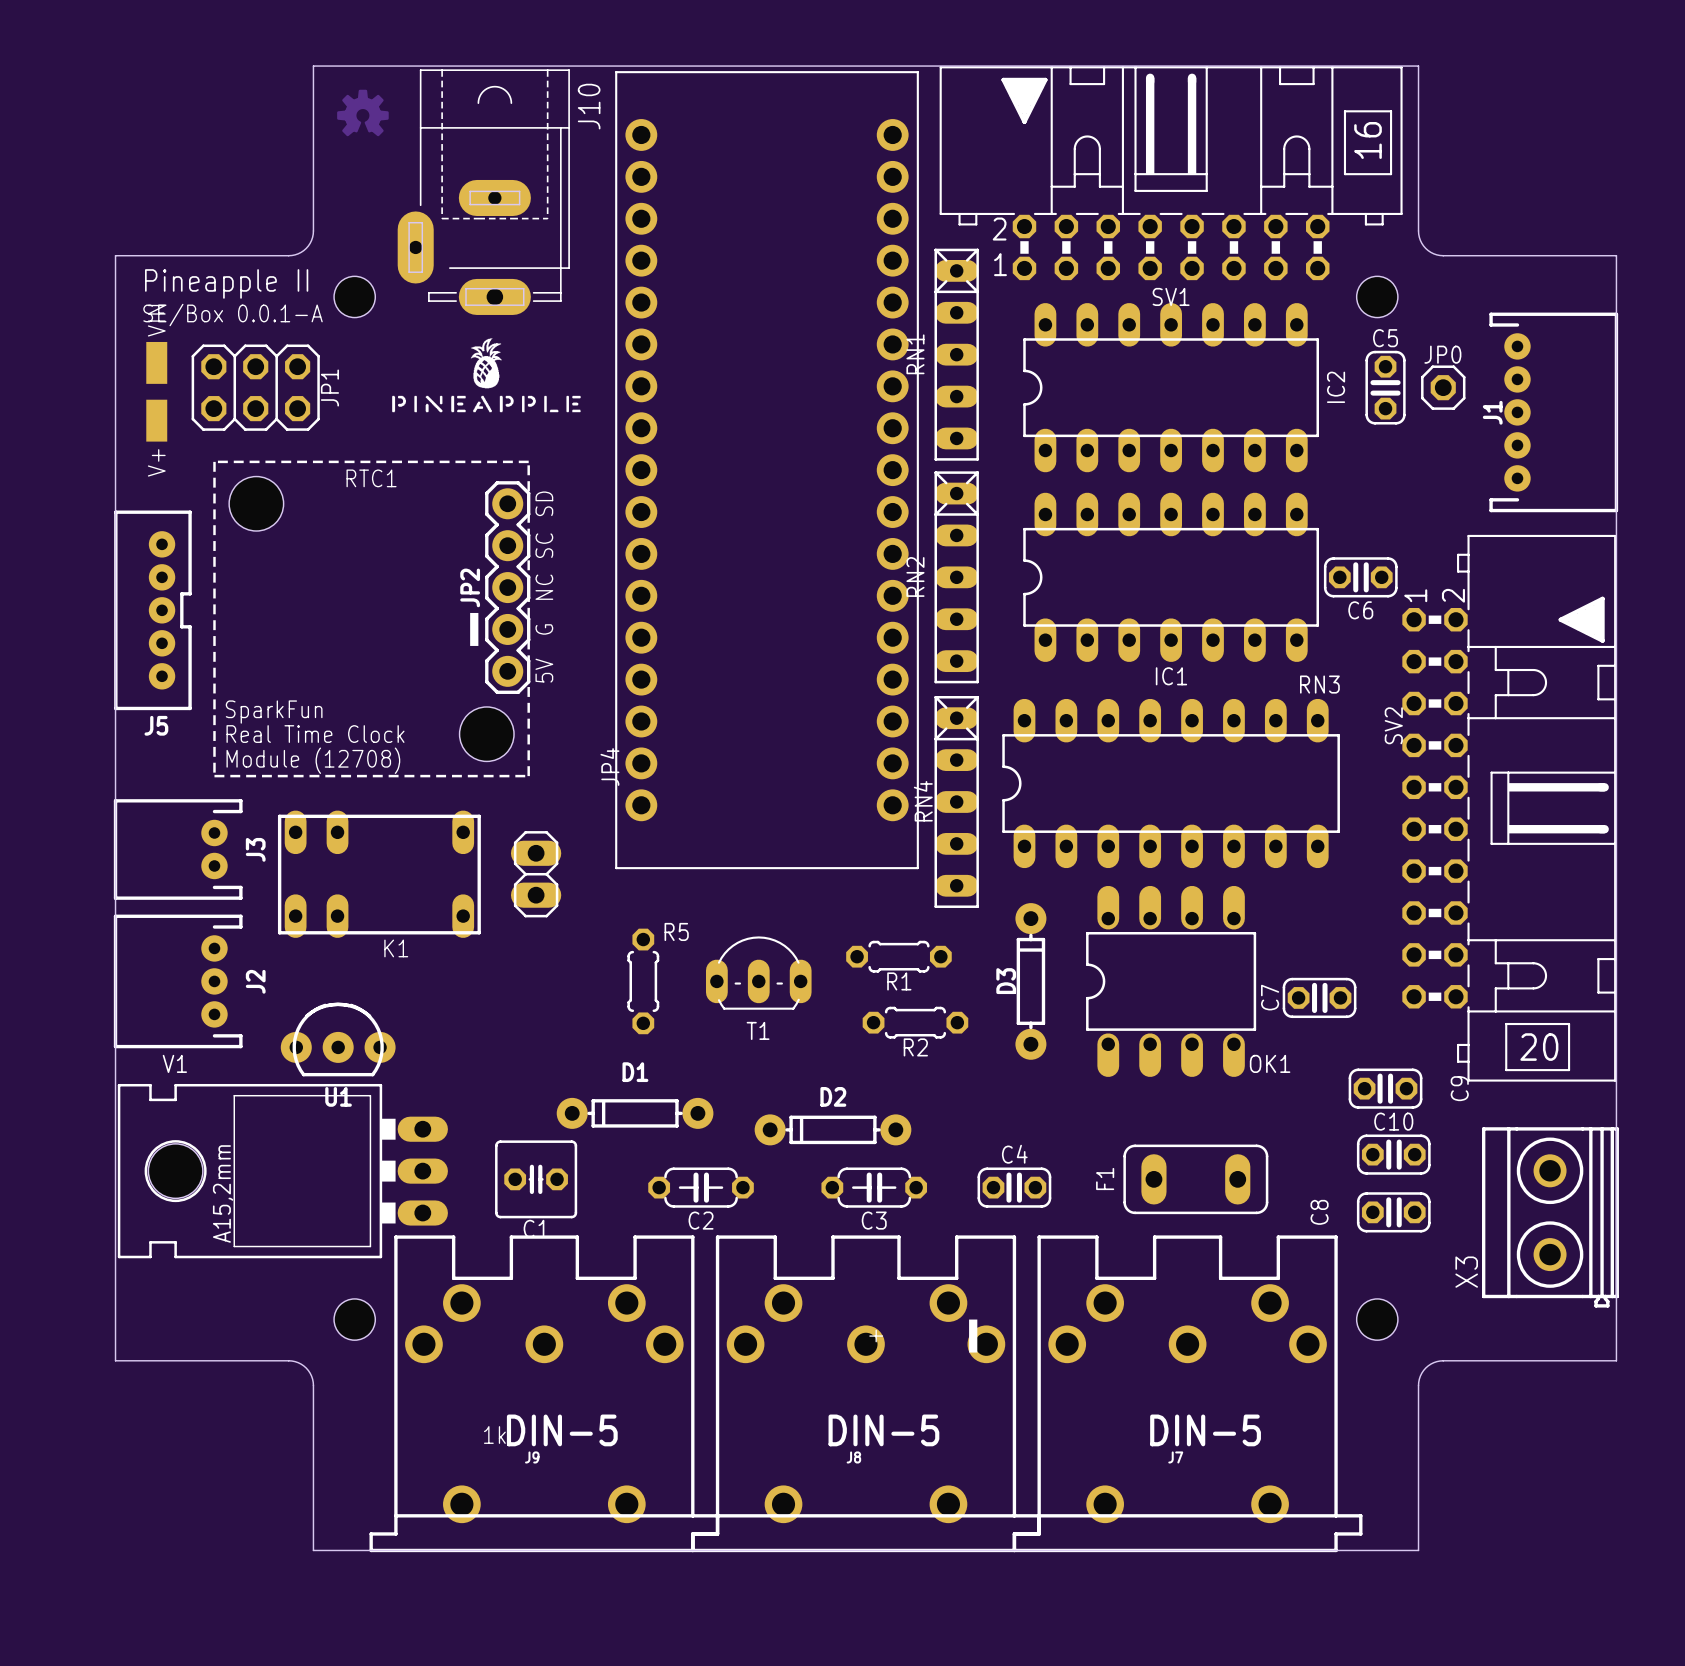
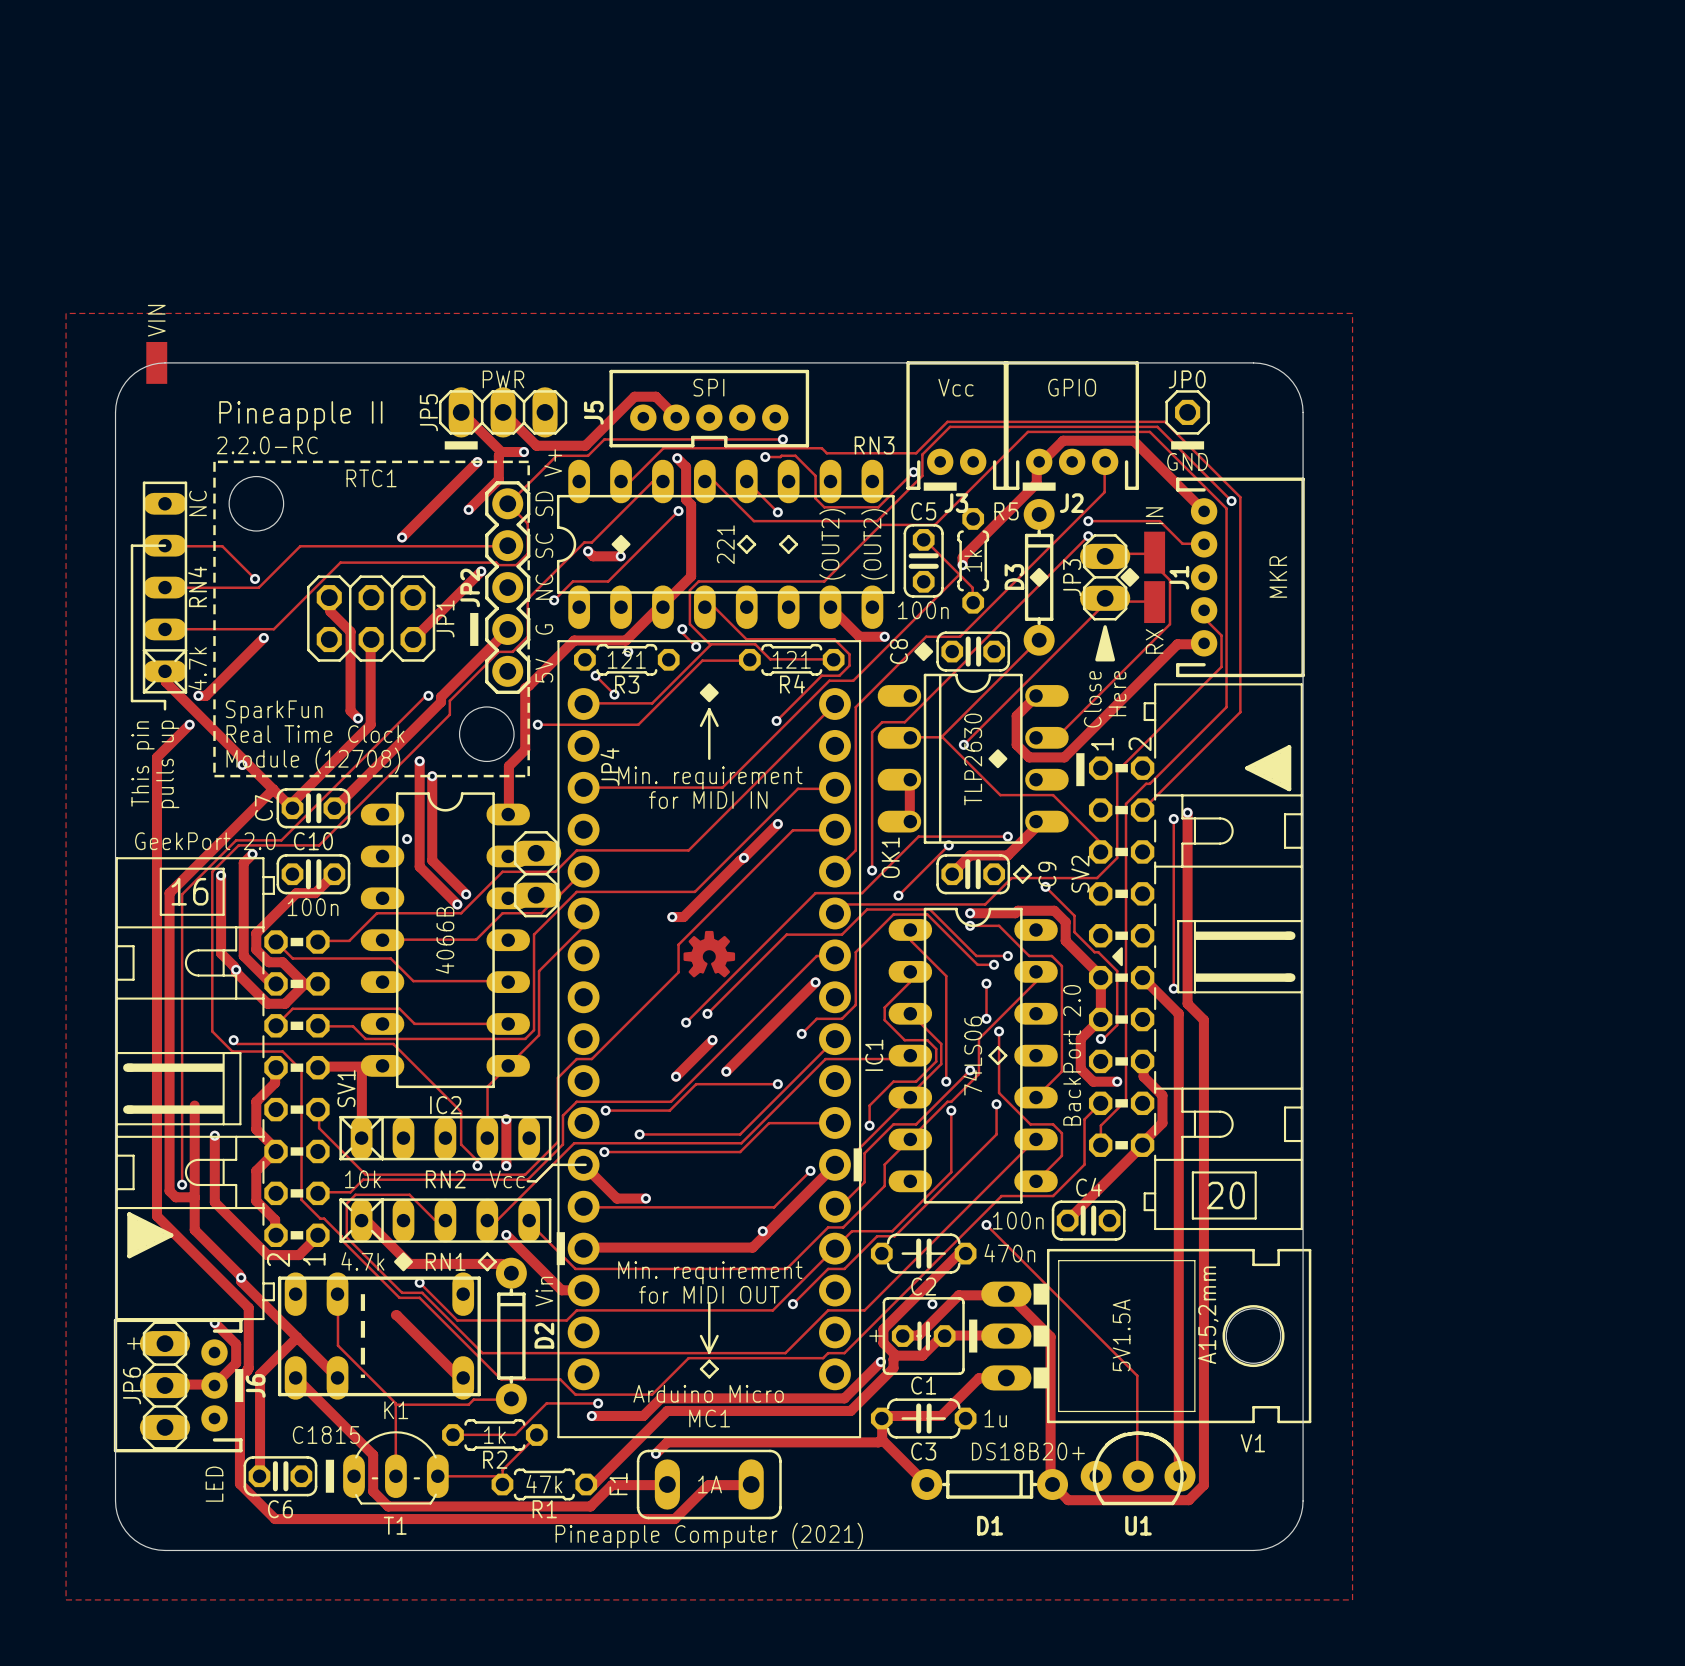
SV1 footprint: [939, 66, 1403, 281] -> [115, 857, 330, 1321]
drawing: [337, 89, 389, 137] -> none
J10: (483, 192) -> none
text position: Pineapple II (226, 283) -> Pineapple II (300, 415)
hole: (354, 296) -> none
SV1 name position: SV1 (1171, 296) -> SV1 (346, 1088)
hole: (1377, 296) -> none
zone outline: none -> (66, 313) (1352, 313) (1352, 1599) (66, 1599) (66, 313)
text: SE/Box 0.0.1-A (233, 315) -> none
drawing: [392, 338, 581, 413] -> none
RN1 rotation: 0° (956, 354) -> 90° counterclockwise (445, 1220)
RN1 position: (956, 354) -> (445, 1220)
text: none -> PWR (503, 379)
JP1 position: (255, 387) -> (371, 618)
text: none -> SPI (708, 387)
text: none -> Vcc (955, 387)
text: none -> GPIO (1072, 387)
IC2 rotation: 0° (1171, 387) -> 90° clockwise (445, 940)
IC2 position: (1171, 387) -> (445, 940)
C5 position: (1385, 387) -> (923, 560)
JP0 position: (1443, 387) -> (1187, 412)
board edge: (115, 412) (115, 255) (288, 255) (301, 252) (310, 243) (313, 230) (313, 66) (1418, 66) (1418, 230) (1420, 240) (1425, 248) (1433, 253) (1443, 255) (1616, 255) (1616, 1360) (1443, 1360) (1430, 1364) (1421, 1373) (1418, 1382) (1418, 1550) (1253, 1550) -> (115, 412) (119, 393) (130, 377) (146, 366) (165, 362) (1253, 362) (1272, 366) (1288, 377) (1299, 393) (1303, 412) (1303, 1500) (1299, 1519) (1288, 1535) (1272, 1546) (1253, 1550)
track: none -> (461, 412) (501, 452)
track: none -> (503, 412) (536, 445) (585, 445) (634, 396) (655, 396) (676, 417)
JP5: none -> (503, 412)
J1 position: (1553, 412) -> (1240, 577)
V+: (156, 420) -> none
track: none -> (782, 439) (604, 439) (588, 455) (556, 455) (507, 503) (527, 523) (527, 553) (516, 565) (498, 565) (496, 562) (340, 562) (273, 629) (165, 629)
via: none -> (782, 439)
drawing: none -> [444, 441, 478, 450]
drawing: none -> [1171, 441, 1205, 450]
text: none -> 2.2.0-RC (267, 445)
track: none -> (501, 452) (523, 452)
track: none -> (501, 452) (498, 455) (498, 479) (468, 509)
via: none -> (523, 452)
track: none -> (765, 457) (795, 455) (815, 475) (815, 498) (824, 507) (878, 507) (913, 472)
via: none -> (765, 457)
track: none -> (677, 458) (686, 467) (686, 499) (691, 504) (691, 576) (664, 602) (662, 607) (658, 607) (625, 640) (574, 640) (525, 688) (525, 749) (508, 766) (508, 814)
via: none -> (677, 458)
track: none -> (1105, 461) (1104, 492) (960, 636) (926, 636) (855, 707) (855, 850) (834, 871)
text: none -> GND (1187, 461)
track: none -> (477, 462) (402, 537)
via: none -> (477, 462)
text: none -> V+ (553, 462)
part: (767, 470) -> none
via: none -> (913, 472)
track: none -> (621, 481) (630, 480) (663, 448) (821, 448) (826, 453) (916, 453) (947, 421) (1164, 421) (1240, 497) (1240, 712) (1142, 810)
track: none -> (662, 481) (652, 482) (591, 542) (584, 542) (527, 599) (527, 636) (512, 651) (498, 651) (449, 700) (449, 714) (319, 845) (238, 845) (212, 871) (212, 1031) (232, 1051) (282, 1051) (301, 1070) (301, 1199) (320, 1218) (324, 1218) (341, 1236) (341, 1240) (399, 1297) (419, 1297) (501, 1379) (560, 1379) (575, 1394) (652, 1394) (688, 1358) (823, 1358) (828, 1353) (844, 1353) (1001, 1196) (1053, 1196) (1084, 1164) (1084, 1119) (1100, 1103)
track: none -> (704, 481) (715, 482) (753, 521) (877, 521) (922, 475) (922, 454) (950, 426) (1157, 426) (1231, 501)
track: none -> (746, 481) (777, 512)
drawing: none -> [923, 482, 957, 491]
drawing: none -> [1022, 482, 1056, 491]
via: none -> (1231, 501)
text: none -> NC (197, 503)
via: none -> (468, 509)
track: none -> (678, 511) (608, 581) (573, 581) (554, 600)
via: none -> (678, 511)
track: none -> (1204, 511) (1133, 440) (1063, 440) (1043, 460) (1039, 460) (1036, 465) (1036, 483) (962, 557) (962, 565)
via: none -> (777, 512)
track: none -> (1088, 521) (1159, 521) (1182, 543) (1204, 544)
via: none -> (1088, 521)
drawing: none -> [611, 534, 631, 554]
line: none -> (746, 536) (738, 544) (746, 552) (754, 544) (746, 536)
line: none -> (788, 536) (780, 544) (788, 552) (796, 544) (788, 536)
track: none -> (1088, 536) (904, 722) (882, 722) (872, 732) (872, 870)
via: none -> (1088, 536)
via: none -> (402, 537)
track: none -> (923, 539) (972, 587) (973, 602)
text: none -> 221 (725, 544)
text: none -> (OUT2) (832, 544)
text: none -> (OUT2) (874, 544)
line: none -> (165, 545) (132, 545) (132, 701) (165, 701) (165, 709)
track: none -> (165, 545) (222, 546) (255, 578)
track: none -> (507, 545) (300, 546) (258, 587) (165, 587)
track: none -> (588, 551) (593, 556) (620, 556)
via: none -> (588, 551)
IN: none -> (1154, 552)
via: none -> (620, 556)
track: none -> (1105, 556) (1108, 553) (1154, 552) (1153, 563) (1169, 580) (1169, 624) (1056, 737) (1036, 737)
text: none -> 1k (973, 560)
via: none -> (962, 565)
drawing: none -> [1029, 567, 1049, 587]
drawing: none -> [1120, 567, 1140, 587]
track: none -> (481, 571) (413, 639)
via: none -> (481, 571)
track: none -> (959, 574) (853, 680) (829, 680) (722, 787) (583, 787)
text: none -> MKR (1278, 576)
RN2 rotation: 0° (956, 577) -> 90° counterclockwise (445, 1138)
RN2 position: (956, 577) -> (445, 1138)
JP3: none -> (1105, 577)
IC1 rotation: 0° (1171, 577) -> 90° clockwise (973, 1055)
IC1 position: (1171, 577) -> (973, 1055)
C6 position: (1360, 577) -> (280, 1476)
via: none -> (255, 578)
track: none -> (329, 597) (330, 611) (350, 631) (350, 710) (358, 718)
via: none -> (554, 600)
track: none -> (1154, 602) (1108, 601) (1105, 598) (1107, 601) (963, 744)
RX: none -> (1154, 602)
track: none -> (704, 607) (715, 607) (746, 639) (834, 639) (849, 654) (849, 665) (839, 675) (821, 675) (776, 720)
track: none -> (830, 607) (859, 636) (884, 636)
J5 rotation: 0° (152, 610) -> 90° clockwise (709, 408)
J5 position: (152, 610) -> (709, 408)
text: none -> 100n (923, 610)
track: none -> (1204, 610) (1205, 619) (1221, 635) (1221, 666) (1117, 771) (1117, 857) (1097, 878) (1011, 878) (985, 904) (844, 904) (834, 913)
drawing: none -> [1095, 625, 1116, 662]
track: none -> (507, 629) (441, 697) (441, 702) (334, 808)
track: none -> (682, 629) (682, 632) (696, 646)
via: none -> (682, 629)
via: none -> (884, 636)
track: none -> (263, 638) (206, 695) (198, 695)
via: none -> (263, 638)
track: none -> (371, 639) (370, 724) (292, 802) (292, 808) (165, 682) (165, 671)
track: none -> (1039, 640) (941, 737) (910, 737)
drawing: none -> [914, 642, 934, 662]
track: none -> (1204, 643) (1177, 644) (1064, 757) (1029, 757) (1016, 744) (1016, 715) (1036, 695)
track: none -> (710, 644) (689, 624) (689, 590) (698, 581) (824, 581) (880, 524) (934, 524) (1027, 431) (1149, 431) (1226, 508) (1226, 707) (1149, 783) (1146, 783) (1126, 803) (1126, 1100) (1100, 1125) (1100, 1145)
via: none -> (696, 646)
via: none -> (628, 651)
text: none -> 121 (626, 659)
R3: none -> (626, 659)
track: none -> (749, 659) (702, 660) (638, 724) (537, 724)
text: none -> 121 (791, 659)
R4: none -> (791, 659)
track: none -> (833, 659) (770, 659) (755, 644) (711, 644) (652, 703) (583, 704)
text: none -> 4.7k (197, 668)
track: none -> (595, 675) (614, 694)
via: none -> (595, 675)
line: none -> (940, 676) (940, 841)
drawing: none -> [699, 683, 719, 703]
text: none -> Here (1117, 693)
via: none -> (614, 694)
via: none -> (198, 695)
track: none -> (428, 695) (425, 695) (281, 840) (236, 840) (182, 894) (182, 1184)
via: none -> (428, 695)
text: none -> Close (1092, 699)
track: none -> (834, 704) (688, 850) (576, 850) (555, 871) (502, 871) (461, 913) (376, 913) (349, 940) (317, 942)
line: none -> (709, 709) (709, 758)
line: none -> (709, 709) (701, 725)
line: none -> (709, 709) (717, 725)
via: none -> (358, 718)
via: none -> (776, 720)
track: none -> (189, 724) (156, 757) (156, 1216) (248, 1307) (248, 1368) (239, 1378) (239, 1483) (275, 1519) (674, 1519) (708, 1485) (751, 1484)
via: none -> (189, 724)
via: none -> (537, 724)
track: none -> (941, 736) (1000, 795) (1053, 795) (1099, 841) (1100, 851)
via: none -> (963, 744)
drawing: none -> [988, 749, 1008, 769]
drawing: none -> [1076, 753, 1085, 787]
text: none -> TLP2630 (973, 759)
track: none -> (419, 761) (419, 866) (457, 904)
via: none -> (419, 761)
text: none -> This pin (143, 764)
text: none -> pulls up (167, 764)
via: none -> (242, 764)
track: none -> (432, 776) (432, 860) (466, 894)
via: none -> (432, 776)
text: none -> Min. requirement (710, 778)
track: none -> (910, 779) (910, 821)
RN3 position: (1171, 783) -> (725, 544)
track: none -> (834, 787) (797, 788) (694, 891) (576, 891) (534, 934) (534, 1030) (525, 1038) (365, 1038) (353, 1026) (317, 1025)
track: none -> (273, 789) (169, 893) (169, 1191) (175, 1197) (194, 1197)
text: none -> for MIDI IN (708, 800)
RN4 rotation: 0° (956, 801) -> 180° (165, 587)
RN4 position: (956, 801) -> (165, 587)
SV2 position: (1509, 808) -> (1195, 956)
track: none -> (1187, 812) (1187, 1003) (1203, 1020) (1203, 1485) (1188, 1500) (1068, 1500) (1050, 1480) (1050, 1336) (1006, 1294) (958, 1295) (918, 1335) (902, 1336)
via: none -> (1187, 812)
track: none -> (1173, 819) (1173, 988)
via: none -> (1173, 819)
track: none -> (1036, 821) (1035, 827) (1007, 855) (970, 855) (952, 874)
track: none -> (777, 824) (683, 917) (672, 917)
via: none -> (777, 824)
track: none -> (834, 829) (792, 830) (678, 944) (678, 972) (591, 1059) (576, 1059) (557, 1077) (557, 1142) (525, 1174) (365, 1174) (319, 1128) (317, 1109)
track: none -> (1007, 836) (918, 836) (862, 893) (815, 893) (686, 1022)
via: none -> (1007, 836)
via: none -> (407, 839)
text: none -> GeekPort 2.0 (205, 841)
track: none -> (948, 845) (898, 895)
via: none -> (948, 845)
J3 rotation: 0° (178, 849) -> 90° clockwise (956, 425)
J3 position: (178, 849) -> (956, 425)
track: none -> (252, 854) (243, 862) (243, 955) (271, 983) (276, 983)
via: none -> (252, 854)
via: none -> (743, 857)
line: none -> (1022, 865) (1014, 874) (1022, 882) (1030, 874) (1022, 865)
via: none -> (872, 870)
track: none -> (583, 871) (541, 913) (502, 913) (476, 939) (382, 940)
track: none -> (334, 874) (315, 893) (296, 893) (256, 933) (256, 949) (268, 962) (282, 962) (304, 984)
K1 position: (379, 874) -> (379, 1336)
track: none -> (221, 875) (221, 953) (233, 966) (236, 972) (267, 1003) (285, 1003) (304, 984)
via: none -> (221, 875)
track: none -> (1045, 886) (1074, 915) (1074, 932) (1117, 971) (1117, 1025) (1103, 1038) (1100, 1038)
via: none -> (1045, 886)
via: none -> (466, 894)
via: none -> (898, 895)
via: none -> (457, 904)
text: none -> 100n (313, 907)
track: none -> (583, 913) (583, 927) (539, 971) (539, 1035) (487, 1086) (487, 1138)
track: none -> (970, 913) (1054, 910) (1065, 922) (1065, 940) (1098, 973) (1100, 978) (1100, 1018) (1080, 1038) (1080, 1069) (1093, 1081) (1117, 1081)
via: none -> (970, 913)
via: none -> (672, 917)
track: none -> (970, 925) (999, 925) (1029, 955) (1051, 955) (1061, 966) (1061, 1071) (1036, 1097)
via: none -> (970, 925)
track: none -> (910, 929) (911, 940) (946, 976) (946, 1081)
drawing: none -> [683, 930, 736, 978]
text: none -> 4066B (445, 940)
track: none -> (276, 942) (292, 958) (390, 958) (413, 981) (508, 982)
drawing: none -> [1112, 947, 1123, 967]
track: none -> (834, 955) (816, 955) (671, 1101) (576, 1101) (562, 1115) (562, 1144) (527, 1179) (363, 1179) (350, 1192) (317, 1193)
track: none -> (1007, 955) (976, 955) (929, 909) (867, 909) (841, 934) (786, 934) (707, 1013)
via: none -> (1007, 955)
R1 position: (898, 956) -> (544, 1484)
track: none -> (994, 964) (977, 964) (927, 914) (893, 914) (855, 952) (855, 1005) (841, 1018) (816, 1018) (801, 1033)
via: none -> (994, 964)
via: none -> (236, 969)
track: none -> (910, 971) (909, 982) (884, 1007) (884, 1020) (904, 1040) (927, 1040) (936, 1049) (936, 1061) (916, 1081) (893, 1081) (869, 1105) (869, 1125)
track: none -> (1036, 971) (1035, 982) (978, 1038) (978, 1074) (951, 1101) (947, 1101) (884, 1164) (884, 1185) (843, 1227) (828, 1227) (786, 1268) (575, 1268) (529, 1220)
T1 position: (758, 973) -> (395, 1467)
track: none -> (1142, 977) (1178, 1013) (1180, 1476)
J2 rotation: 0° (178, 981) -> 90° clockwise (1072, 425)
J2 position: (178, 981) -> (1072, 425)
R5 position: (643, 981) -> (973, 560)
D3 position: (1030, 981) -> (1039, 577)
OK1 rotation: 0° (1171, 981) -> 90° clockwise (973, 758)
OK1 position: (1171, 981) -> (973, 758)
track: none -> (815, 982) (726, 1071)
via: none -> (815, 982)
track: none -> (986, 983) (986, 1018)
via: none -> (986, 983)
via: none -> (1173, 988)
C7 position: (1319, 997) -> (313, 808)
via: none -> (707, 1013)
track: none -> (910, 1013) (941, 1043) (941, 1064) (855, 1152) (855, 1178)
via: none -> (986, 1018)
via: none -> (686, 1022)
R2 position: (915, 1022) -> (494, 1435)
track: none -> (508, 1023) (414, 1023) (399, 1008) (292, 1008) (276, 1025)
track: none -> (999, 1031) (999, 1092) (1030, 1124) (1053, 1124) (1061, 1133) (1061, 1155) (1036, 1181)
via: none -> (999, 1031)
via: none -> (801, 1033)
via: none -> (1100, 1038)
U1 position: (338, 1039) -> (1138, 1468)
part: none -> (709, 1039)
track: none -> (834, 1039) (740, 1134) (639, 1134)
track: none -> (233, 1040) (237, 1043) (393, 1043) (461, 1111) (461, 1144) (477, 1160) (477, 1165)
via: none -> (233, 1040)
track: none -> (712, 1040) (676, 1076)
via: none -> (712, 1040)
line: none -> (997, 1047) (989, 1055) (997, 1063) (1006, 1055) (997, 1047)
track: none -> (910, 1055) (907, 1059) (825, 1059) (741, 1143) (574, 1143) (497, 1219) (487, 1220)
text: none -> BackPort 2.0 (1072, 1055)
text: none -> 74LS06 (972, 1056)
track: none -> (1142, 1061) (1143, 1076) (1162, 1095) (1162, 1123) (1067, 1220)
V1 name position: V1 (174, 1063) -> V1 (1252, 1443)
track: none -> (276, 1067) (275, 1082) (256, 1101) (256, 1129) (276, 1151) (256, 1170) (256, 1201) (275, 1219) (276, 1235)
track: none -> (317, 1067) (382, 1065) (361, 1070) (361, 1138)
track: none -> (970, 1070) (916, 1124) (893, 1124) (864, 1153) (864, 1182) (840, 1206) (834, 1206)
via: none -> (970, 1070)
via: none -> (726, 1071)
via: none -> (676, 1076)
via: none -> (946, 1081)
via: none -> (1117, 1081)
V1 footprint: [117, 1083, 448, 1259] -> [981, 1248, 1312, 1424]
track: none -> (777, 1084) (696, 1084) (669, 1110) (605, 1110)
via: none -> (777, 1084)
C9 position: (1385, 1088) -> (973, 874)
track: none -> (996, 1104) (996, 1134) (894, 1236) (877, 1236) (844, 1268) (828, 1268) (792, 1304)
via: none -> (996, 1104)
track: none -> (194, 1105) (194, 1229) (238, 1273) (241, 1281) (337, 1377)
via: none -> (605, 1110)
track: none -> (951, 1110) (951, 1172) (892, 1231) (852, 1231) (772, 1310) (576, 1310) (566, 1320) (457, 1320) (419, 1282)
via: none -> (951, 1110)
D1 rotation: 0° (635, 1113) -> 180° (989, 1484)
D1 position: (635, 1113) -> (989, 1484)
track: none -> (506, 1119) (506, 1165)
via: none -> (506, 1119)
track: none -> (834, 1122) (769, 1123) (740, 1152) (604, 1152)
via: none -> (869, 1125)
D2 rotation: 0° (832, 1129) -> 90° clockwise (511, 1336)
D2 position: (832, 1129) -> (511, 1336)
via: none -> (639, 1134)
track: none -> (214, 1135) (214, 1202) (267, 1255) (299, 1255) (317, 1235)
via: none -> (214, 1135)
track: none -> (1036, 1139) (864, 1310) (828, 1310) (785, 1353) (482, 1353) (422, 1292) (402, 1292) (346, 1237) (346, 1203) (355, 1194) (409, 1194) (434, 1219) (445, 1220)
drawing: none -> [853, 1148, 862, 1182]
via: none -> (604, 1152)
C10 position: (1393, 1154) -> (313, 874)
track: none -> (583, 1164) (616, 1198) (645, 1198)
line: none -> (585, 1164) (552, 1164) (536, 1181) (527, 1181)
track: none -> (834, 1164) (752, 1247) (583, 1248)
via: none -> (477, 1165)
via: none -> (506, 1165)
track: none -> (810, 1170) (774, 1207) (583, 1206)
via: none -> (810, 1170)
text: none -> 10k (362, 1179)
text: none -> Vcc (507, 1179)
C1 position: (536, 1179) -> (923, 1336)
F1 position: (1195, 1179) -> (709, 1484)
via: none -> (182, 1184)
C2 position: (701, 1187) -> (923, 1253)
C3 position: (874, 1187) -> (923, 1418)
C4 position: (1014, 1187) -> (1088, 1220)
via: none -> (645, 1198)
C8 position: (1393, 1212) -> (973, 651)
X3: (1550, 1217) -> none
track: none -> (361, 1220) (366, 1221) (409, 1263) (501, 1263) (511, 1273)
text: none -> 100n (1018, 1220)
track: none -> (986, 1224) (1137, 1375) (1138, 1476)
via: none -> (986, 1224)
via: none -> (762, 1231)
drawing: none -> [556, 1232, 565, 1266]
track: none -> (506, 1235) (561, 1290) (583, 1290)
via: none -> (506, 1235)
drawing: none -> [394, 1252, 413, 1272]
line: none -> (487, 1253) (479, 1261) (487, 1270) (495, 1261) (487, 1253)
track: none -> (965, 1253) (958, 1253) (883, 1329) (883, 1343) (896, 1355)
text: none -> 470n (1009, 1253)
text: none -> 4.7k (362, 1261)
text: none -> Min. requirement (710, 1272)
via: none -> (241, 1277)
via: none -> (419, 1282)
text: none -> Vin (544, 1291)
track: none -> (337, 1294) (337, 1345) (395, 1403) (395, 1476)
line: none -> (362, 1294) (362, 1377)
text: none -> for MIDI OUT (709, 1294)
line: none -> (709, 1303) (709, 1352)
via: none -> (792, 1304)
via: none -> (932, 1304)
track: none -> (395, 1315) (458, 1377) (463, 1377)
hole: (354, 1319) -> none
hole: (1377, 1319) -> none
track: none -> (214, 1322) (236, 1344) (236, 1363) (214, 1385) (165, 1385)
via: none -> (214, 1322)
text: none -> 5V1.5A (1121, 1335)
line: none -> (701, 1336) (709, 1352)
line: none -> (717, 1336) (709, 1352)
track: none -> (1006, 1336) (945, 1335) (922, 1355) (896, 1355)
track: none -> (297, 1337) (260, 1374) (259, 1476)
text: none -> + (133, 1343)
track: none -> (896, 1355) (893, 1359) (893, 1368) (850, 1410) (667, 1410) (594, 1483) (586, 1484)
board edge: (115, 1360) (288, 1360) (298, 1362) (306, 1368) (311, 1376) (313, 1385) (313, 1550) -> (115, 1360) (115, 1507) (122, 1525) (130, 1535) (140, 1543) (158, 1550) (313, 1550)
line: none -> (709, 1360) (701, 1369) (709, 1377) (717, 1369) (709, 1360)
track: none -> (880, 1361) (844, 1398) (660, 1398) (643, 1415) (591, 1415)
via: none -> (880, 1361)
drawing: none -> [235, 1369, 244, 1403]
track: none -> (295, 1377) (373, 1454) (373, 1491) (388, 1506) (590, 1506) (611, 1485) (667, 1484)
track: none -> (1006, 1377) (978, 1378) (941, 1415) (885, 1415) (881, 1418) (882, 1439)
JP6: none -> (165, 1385)
J6: none -> (178, 1385)
J9: (544, 1393) -> none
text: none -> Arduino Micro (708, 1393)
J8: (865, 1393) -> none
J7: (1187, 1393) -> none
track: none -> (511, 1398) (473, 1399) (468, 1404) (395, 1404)
track: none -> (598, 1403) (546, 1403) (515, 1434) (452, 1435)
via: none -> (598, 1403)
via: none -> (591, 1415)
text: none -> MC1 (709, 1418)
text: none -> 1u (995, 1418)
text: none -> C1815 (326, 1435)
track: none -> (536, 1435) (502, 1470) (502, 1483) (502, 1484) (502, 1476) (438, 1476) (437, 1476)
track: none -> (882, 1439) (926, 1484)
track: none -> (882, 1439) (878, 1442) (667, 1442) (655, 1453)
text: none -> DS18B20+ (1028, 1451)
via: none -> (655, 1453)
drawing: none -> [325, 1459, 335, 1493]
text: none -> LED (214, 1484)
text: none -> 47k (544, 1484)
text: none -> 1A (710, 1484)
text: none -> Pineapple Computer (2021) (709, 1535)

